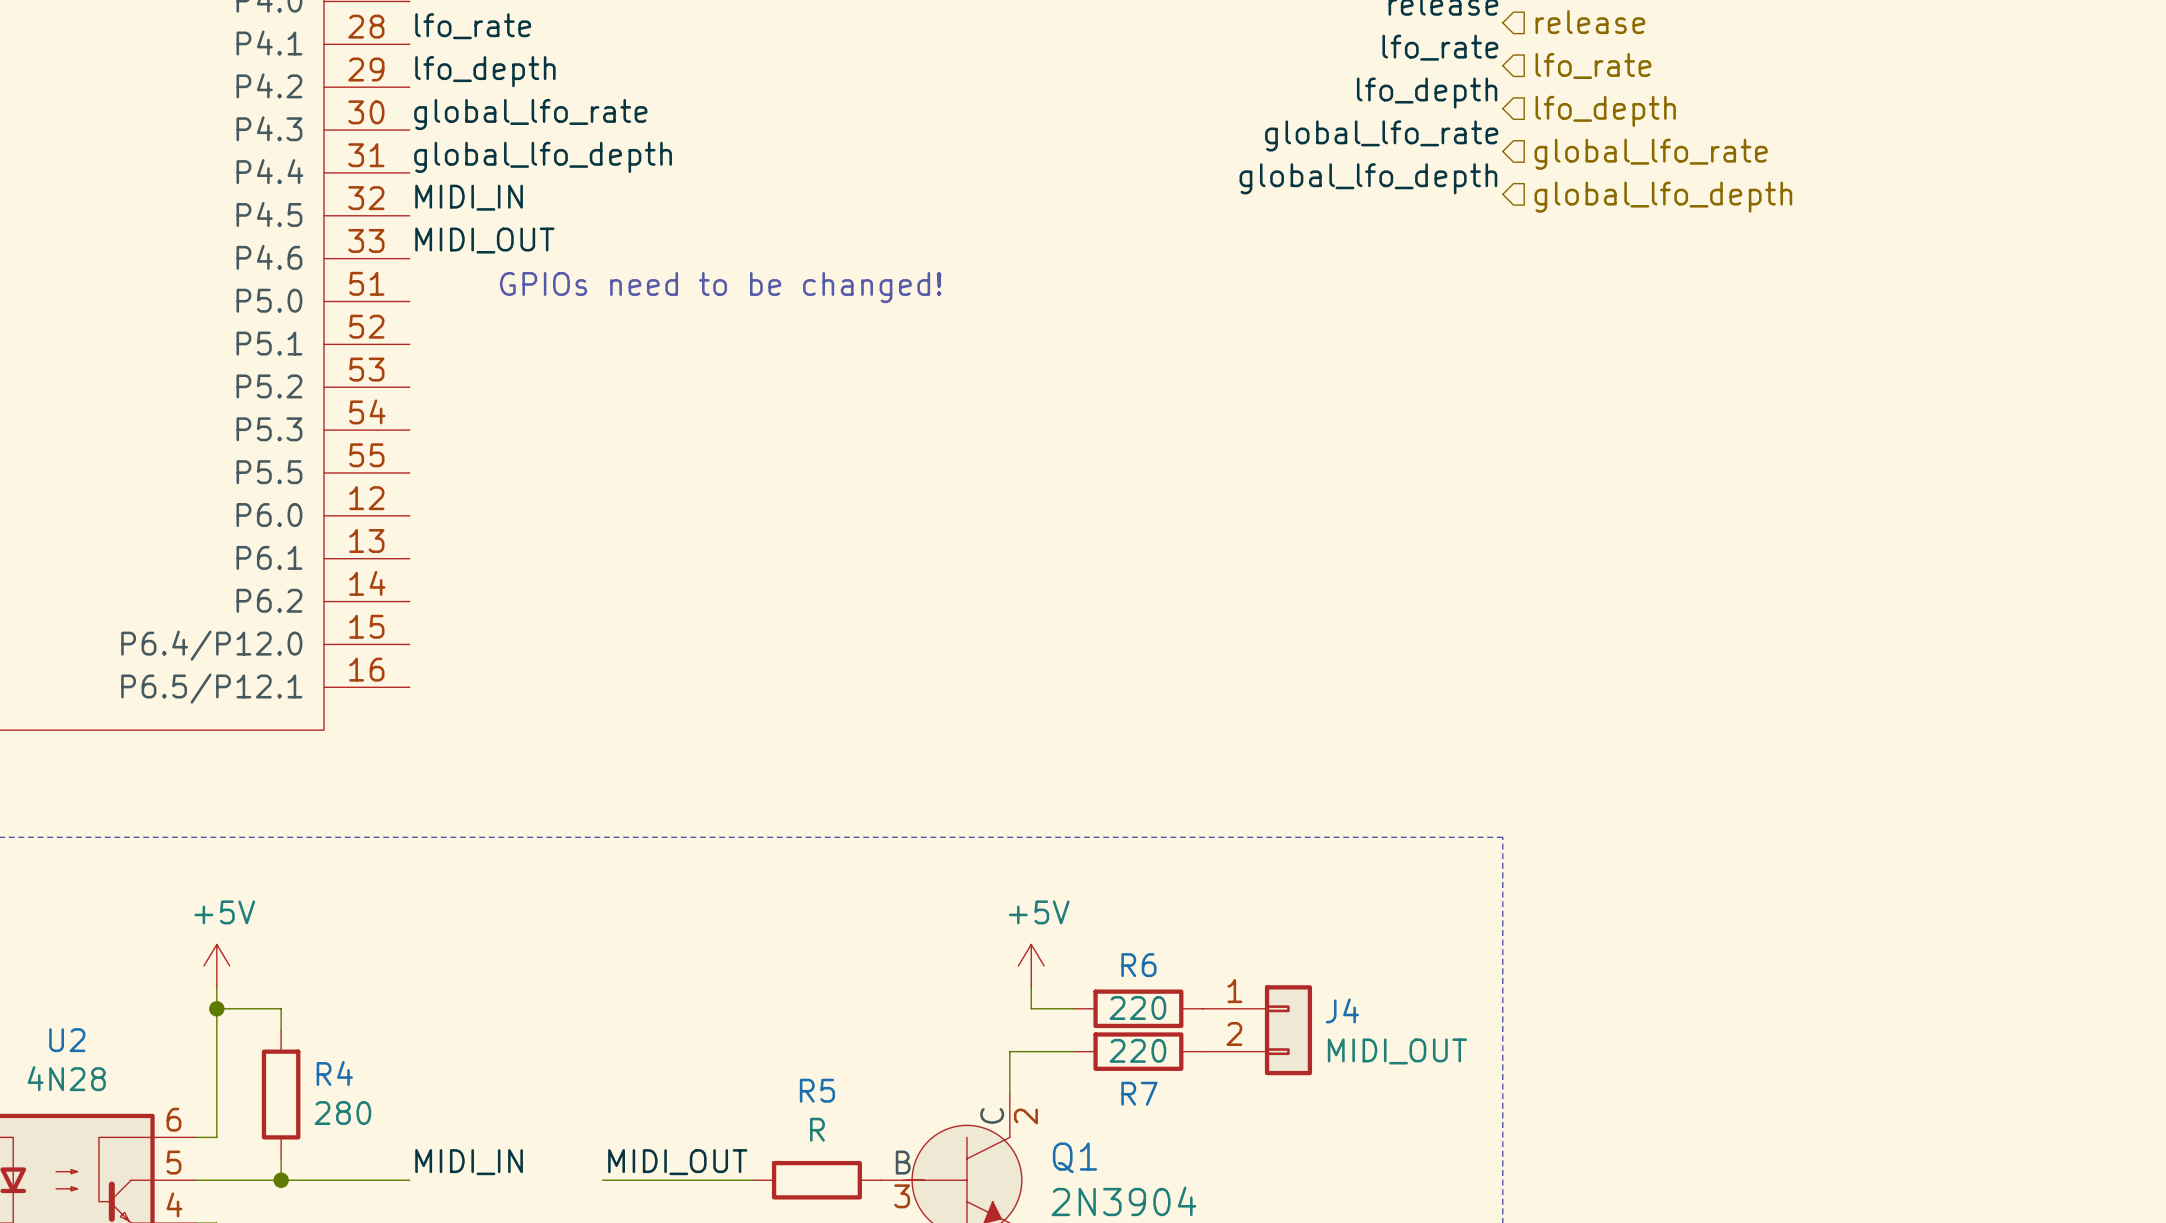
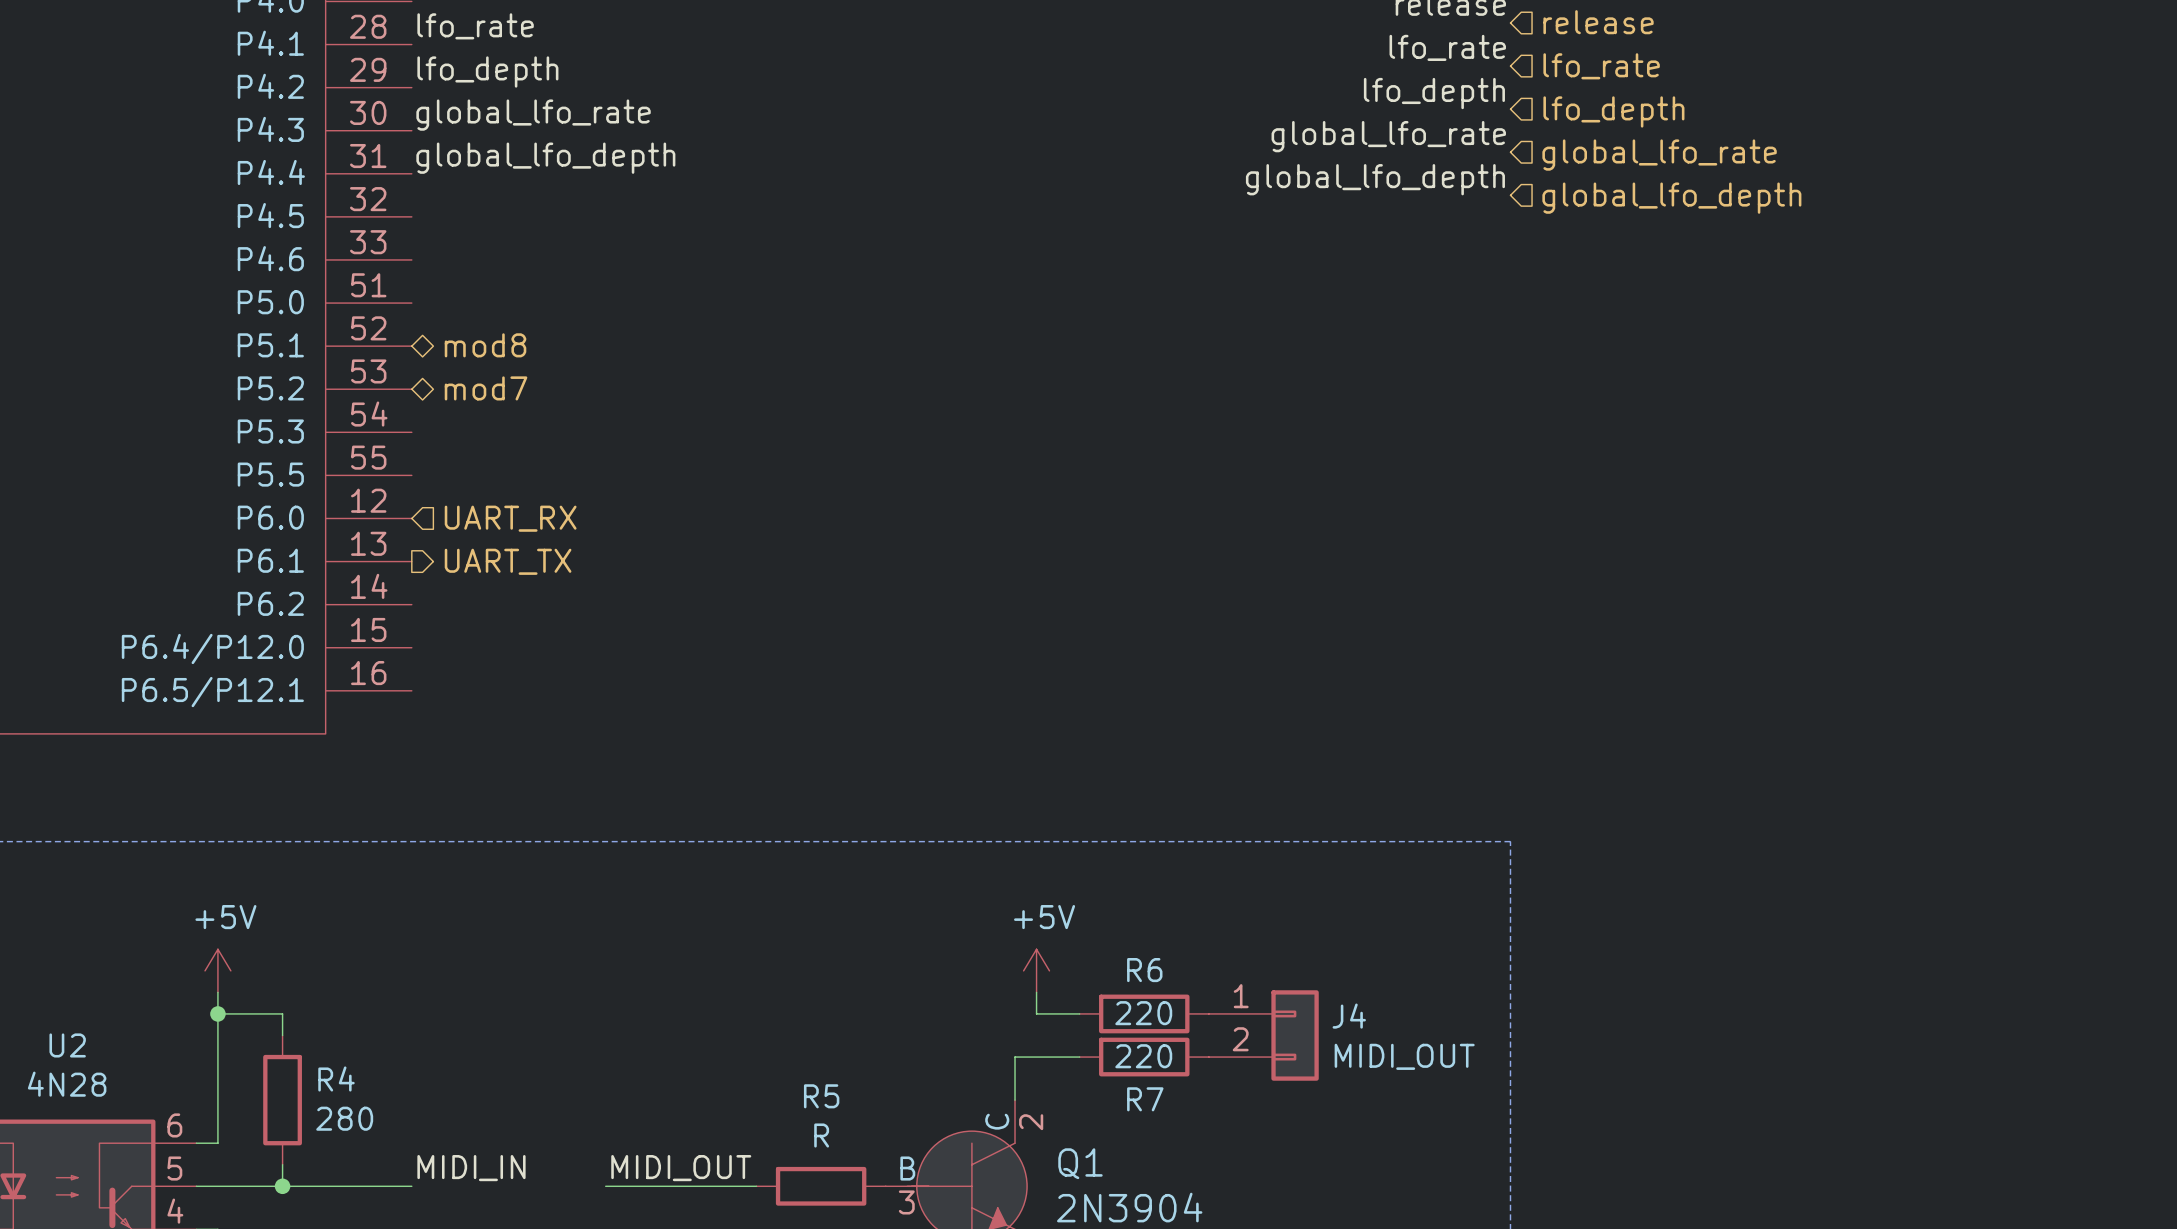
label: MIDI_IN (469, 197) -> none
label: MIDI_OUT (484, 240) -> none
text: GPIOs need to be changed! (720, 287) -> none
hierarchical label: none -> mod8 (485, 345)
hierarchical label: none -> mod7 (486, 388)
hierarchical label: none -> UART_RX (510, 518)
hierarchical label: none -> UART_TX (508, 561)

